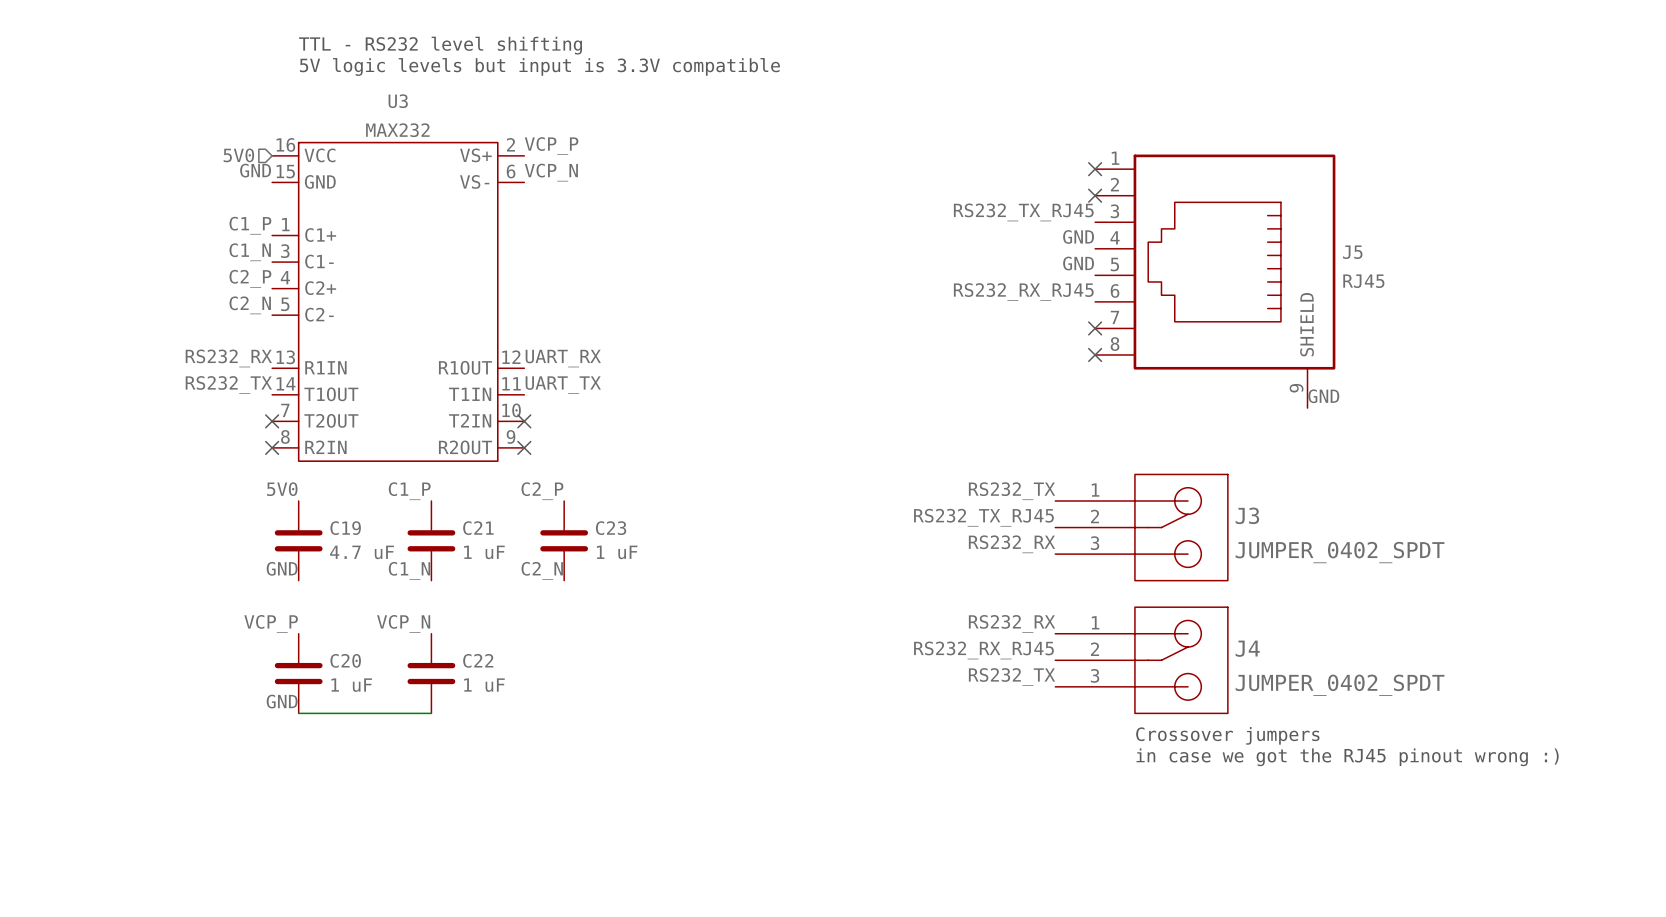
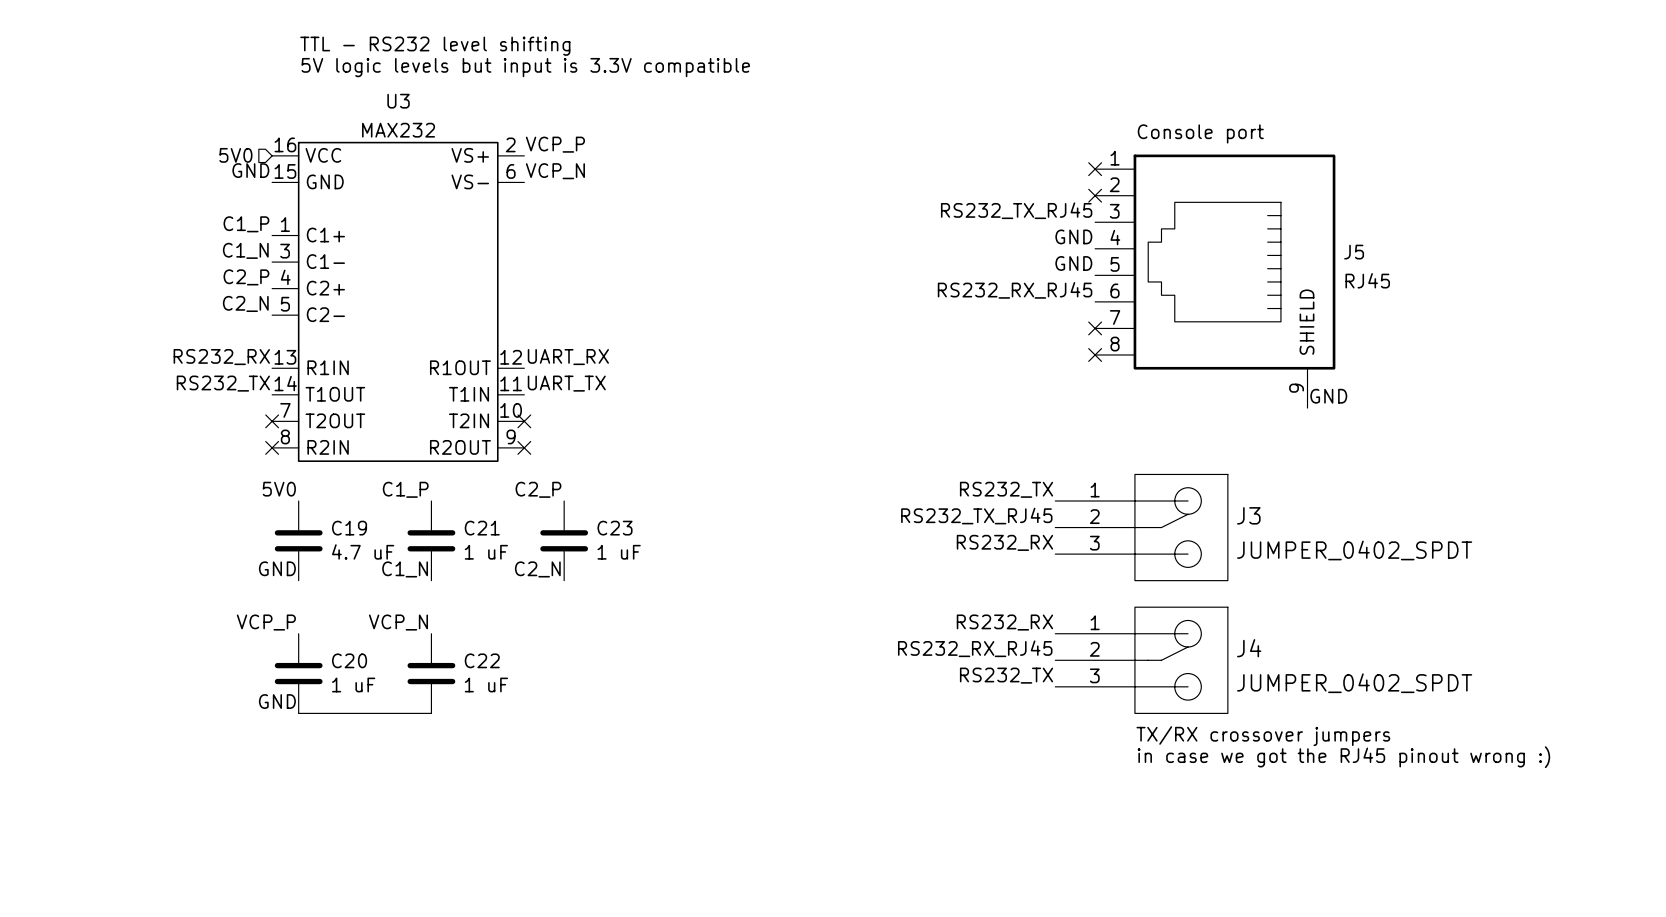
text: none -> Console port (1200, 133)
text: Crossover jumpers (1227, 735) -> TX/RX crossover jumpers (1263, 736)

